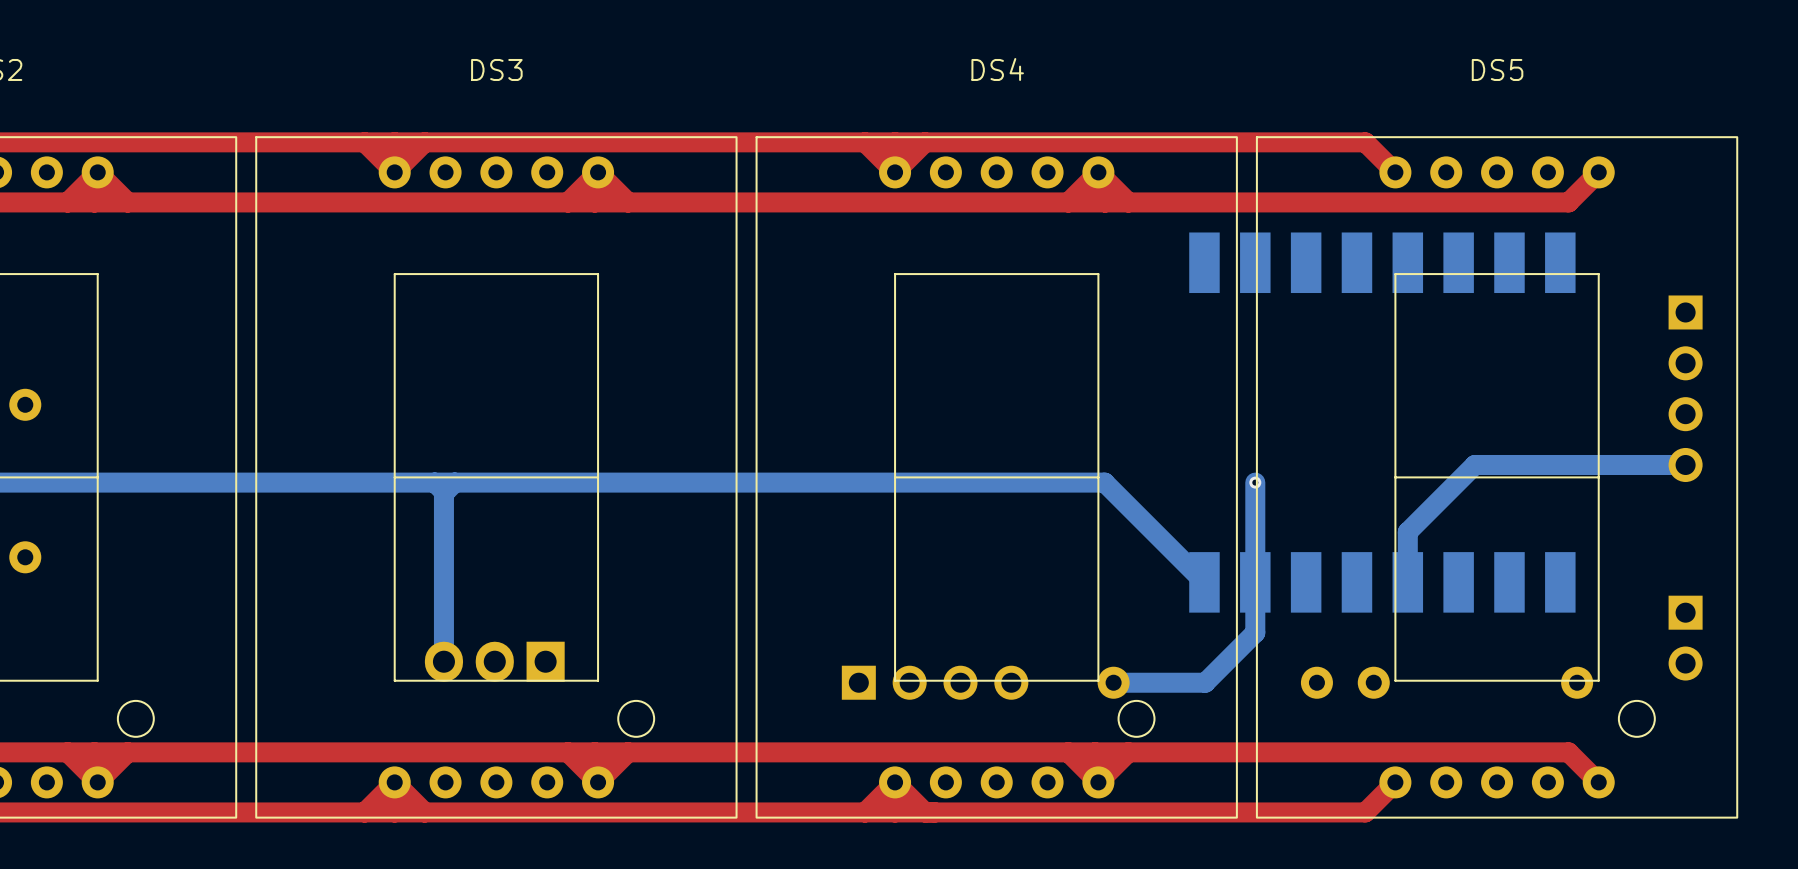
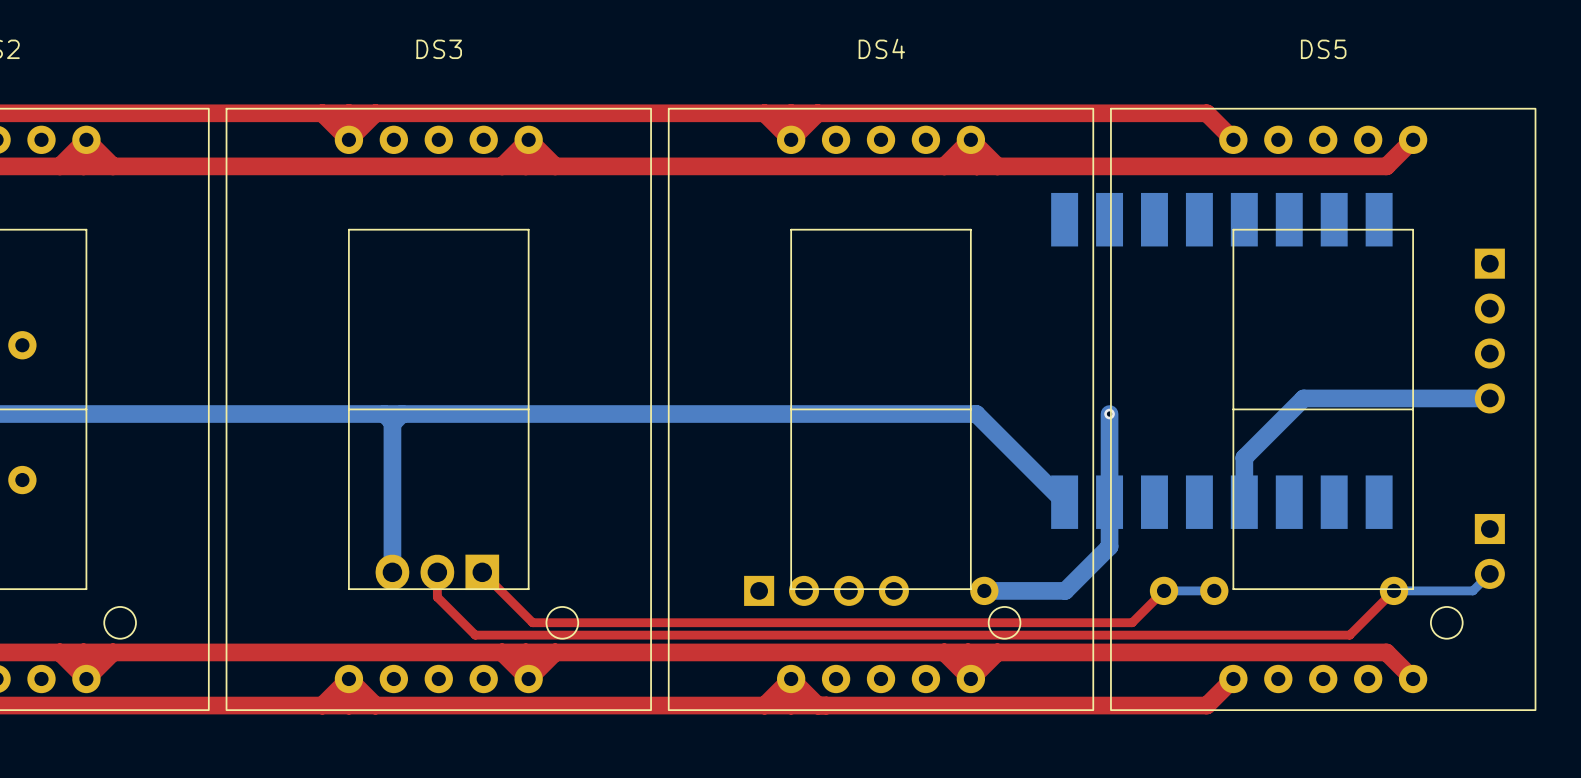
top track: none -> (437, 572) (437, 597) (475, 635) (1349, 635) (1393, 590)
top track: none -> (482, 572) (532, 622) (1132, 622) (1164, 590)
bottom track: none -> (1489, 573) (1472, 590) (1393, 590)
bottom track: none -> (1164, 590) (1214, 590)

